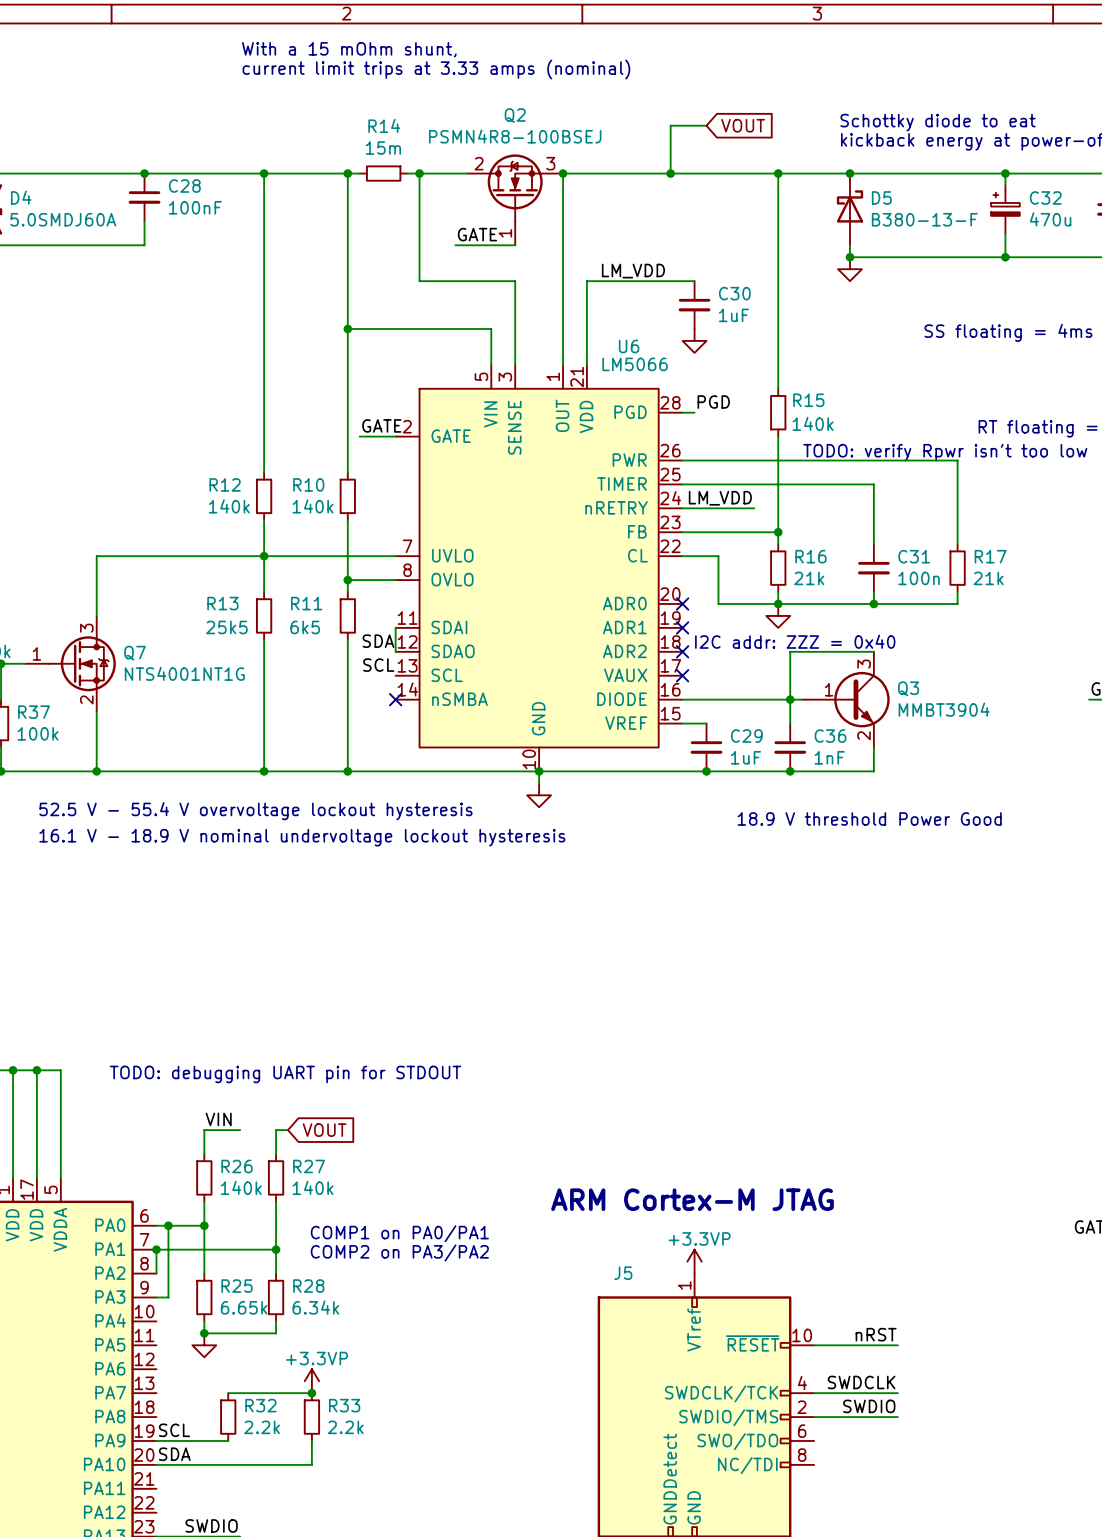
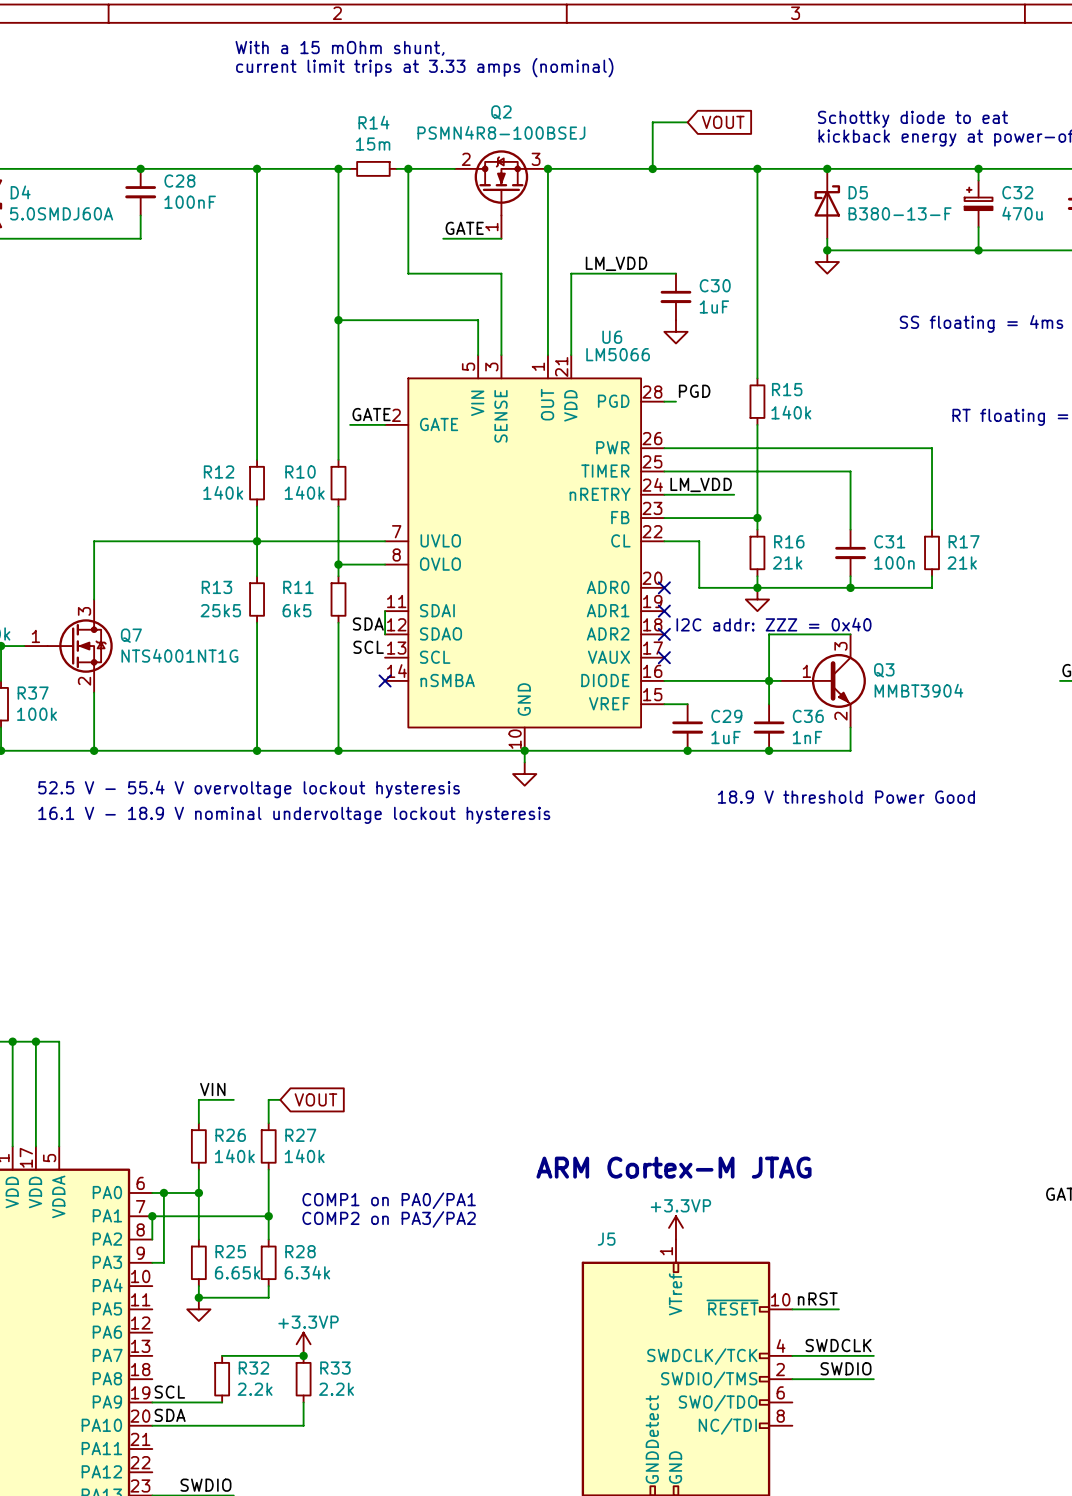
text: TODO: verify Rpwr isn't too low (945, 452) -> none
text: TODO: debugging UART pin for STDOUT (285, 1074) -> none
label position: nRST (876, 1334) -> nRST (817, 1298)
wire: (861, 1345) (897, 1345) -> none

